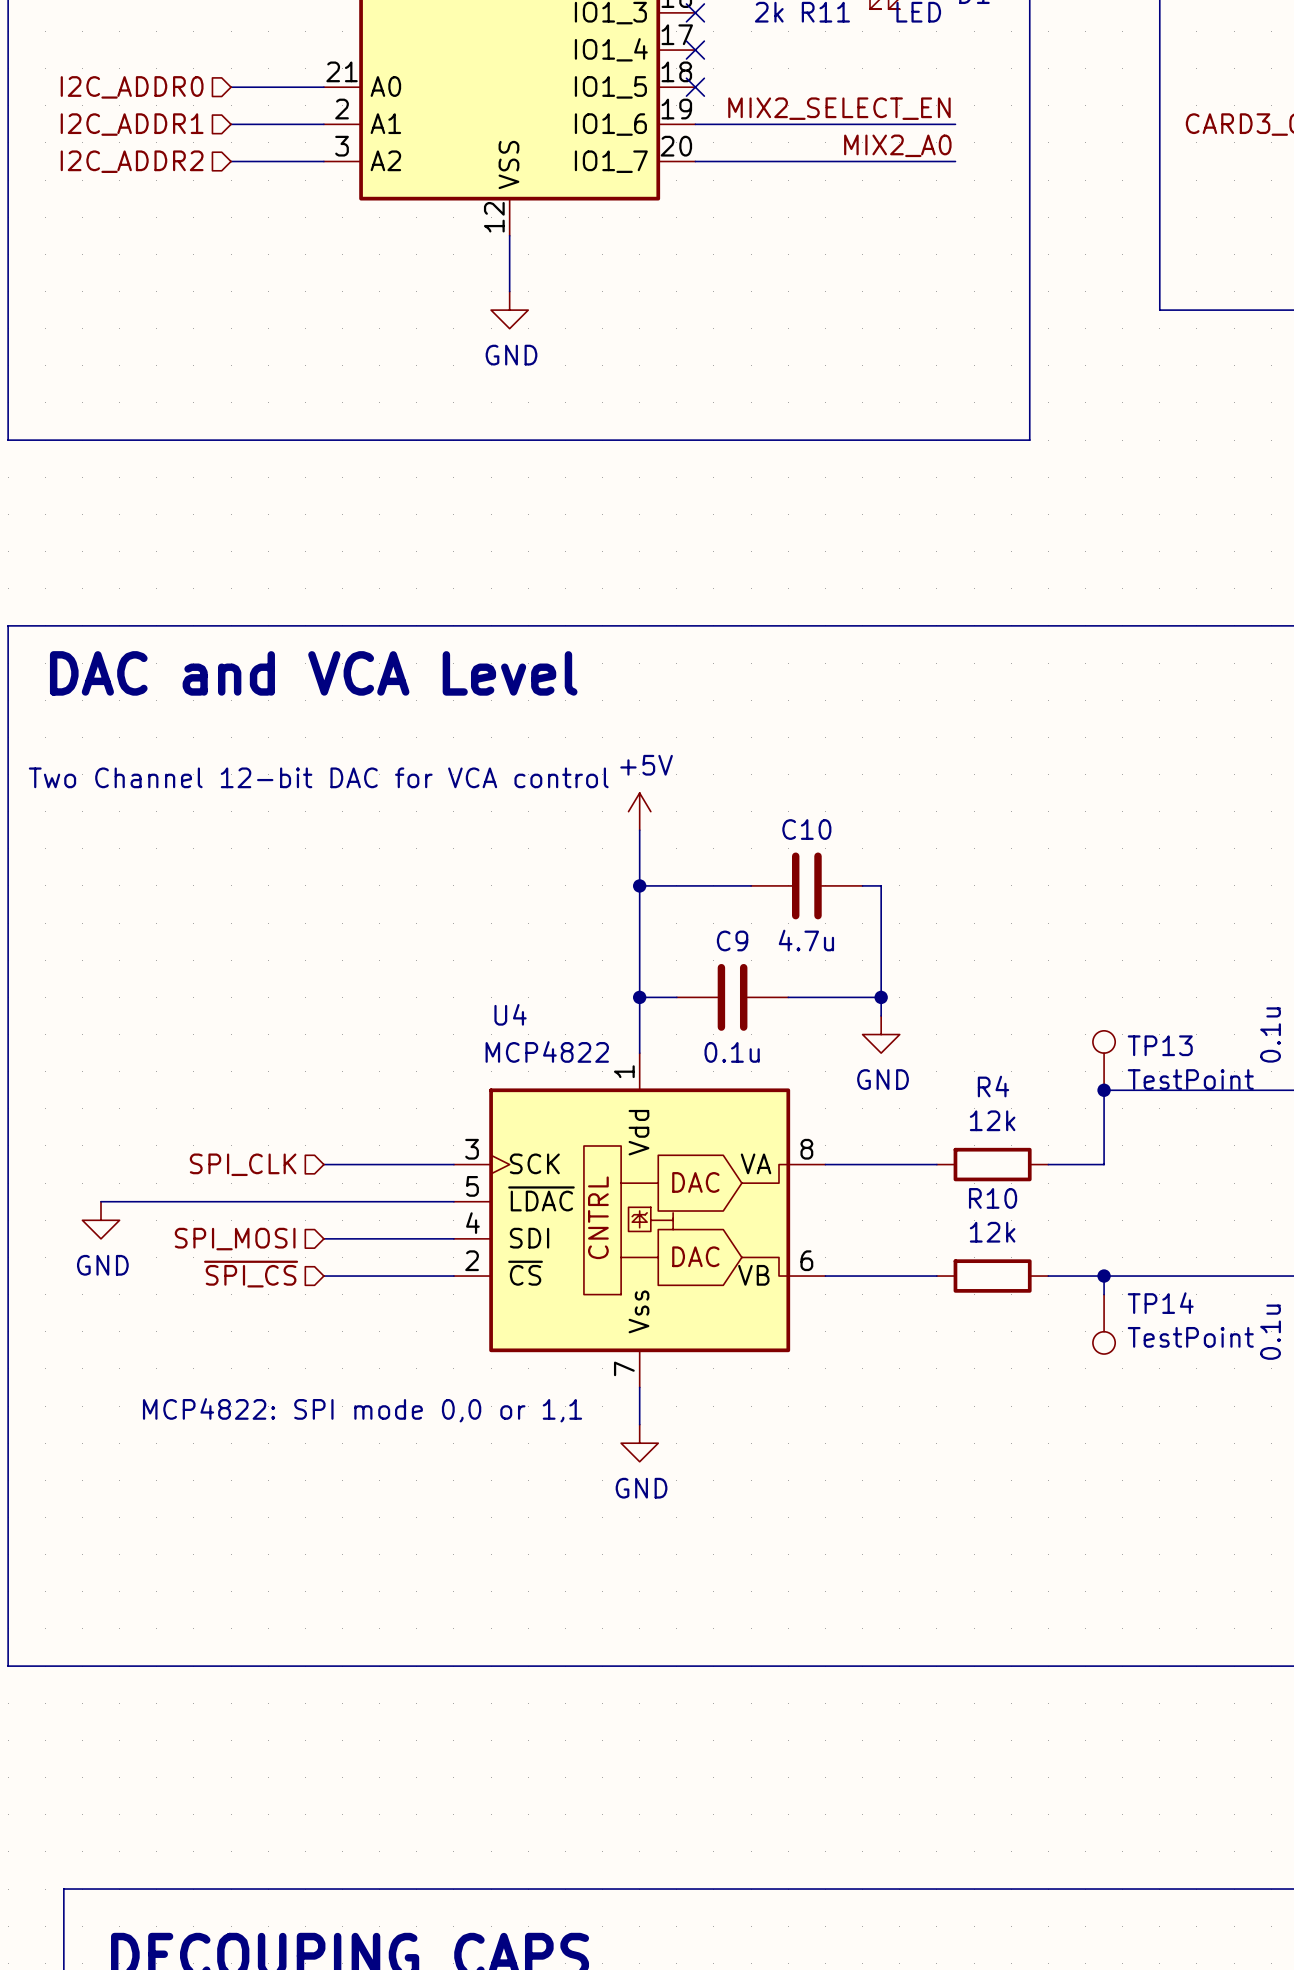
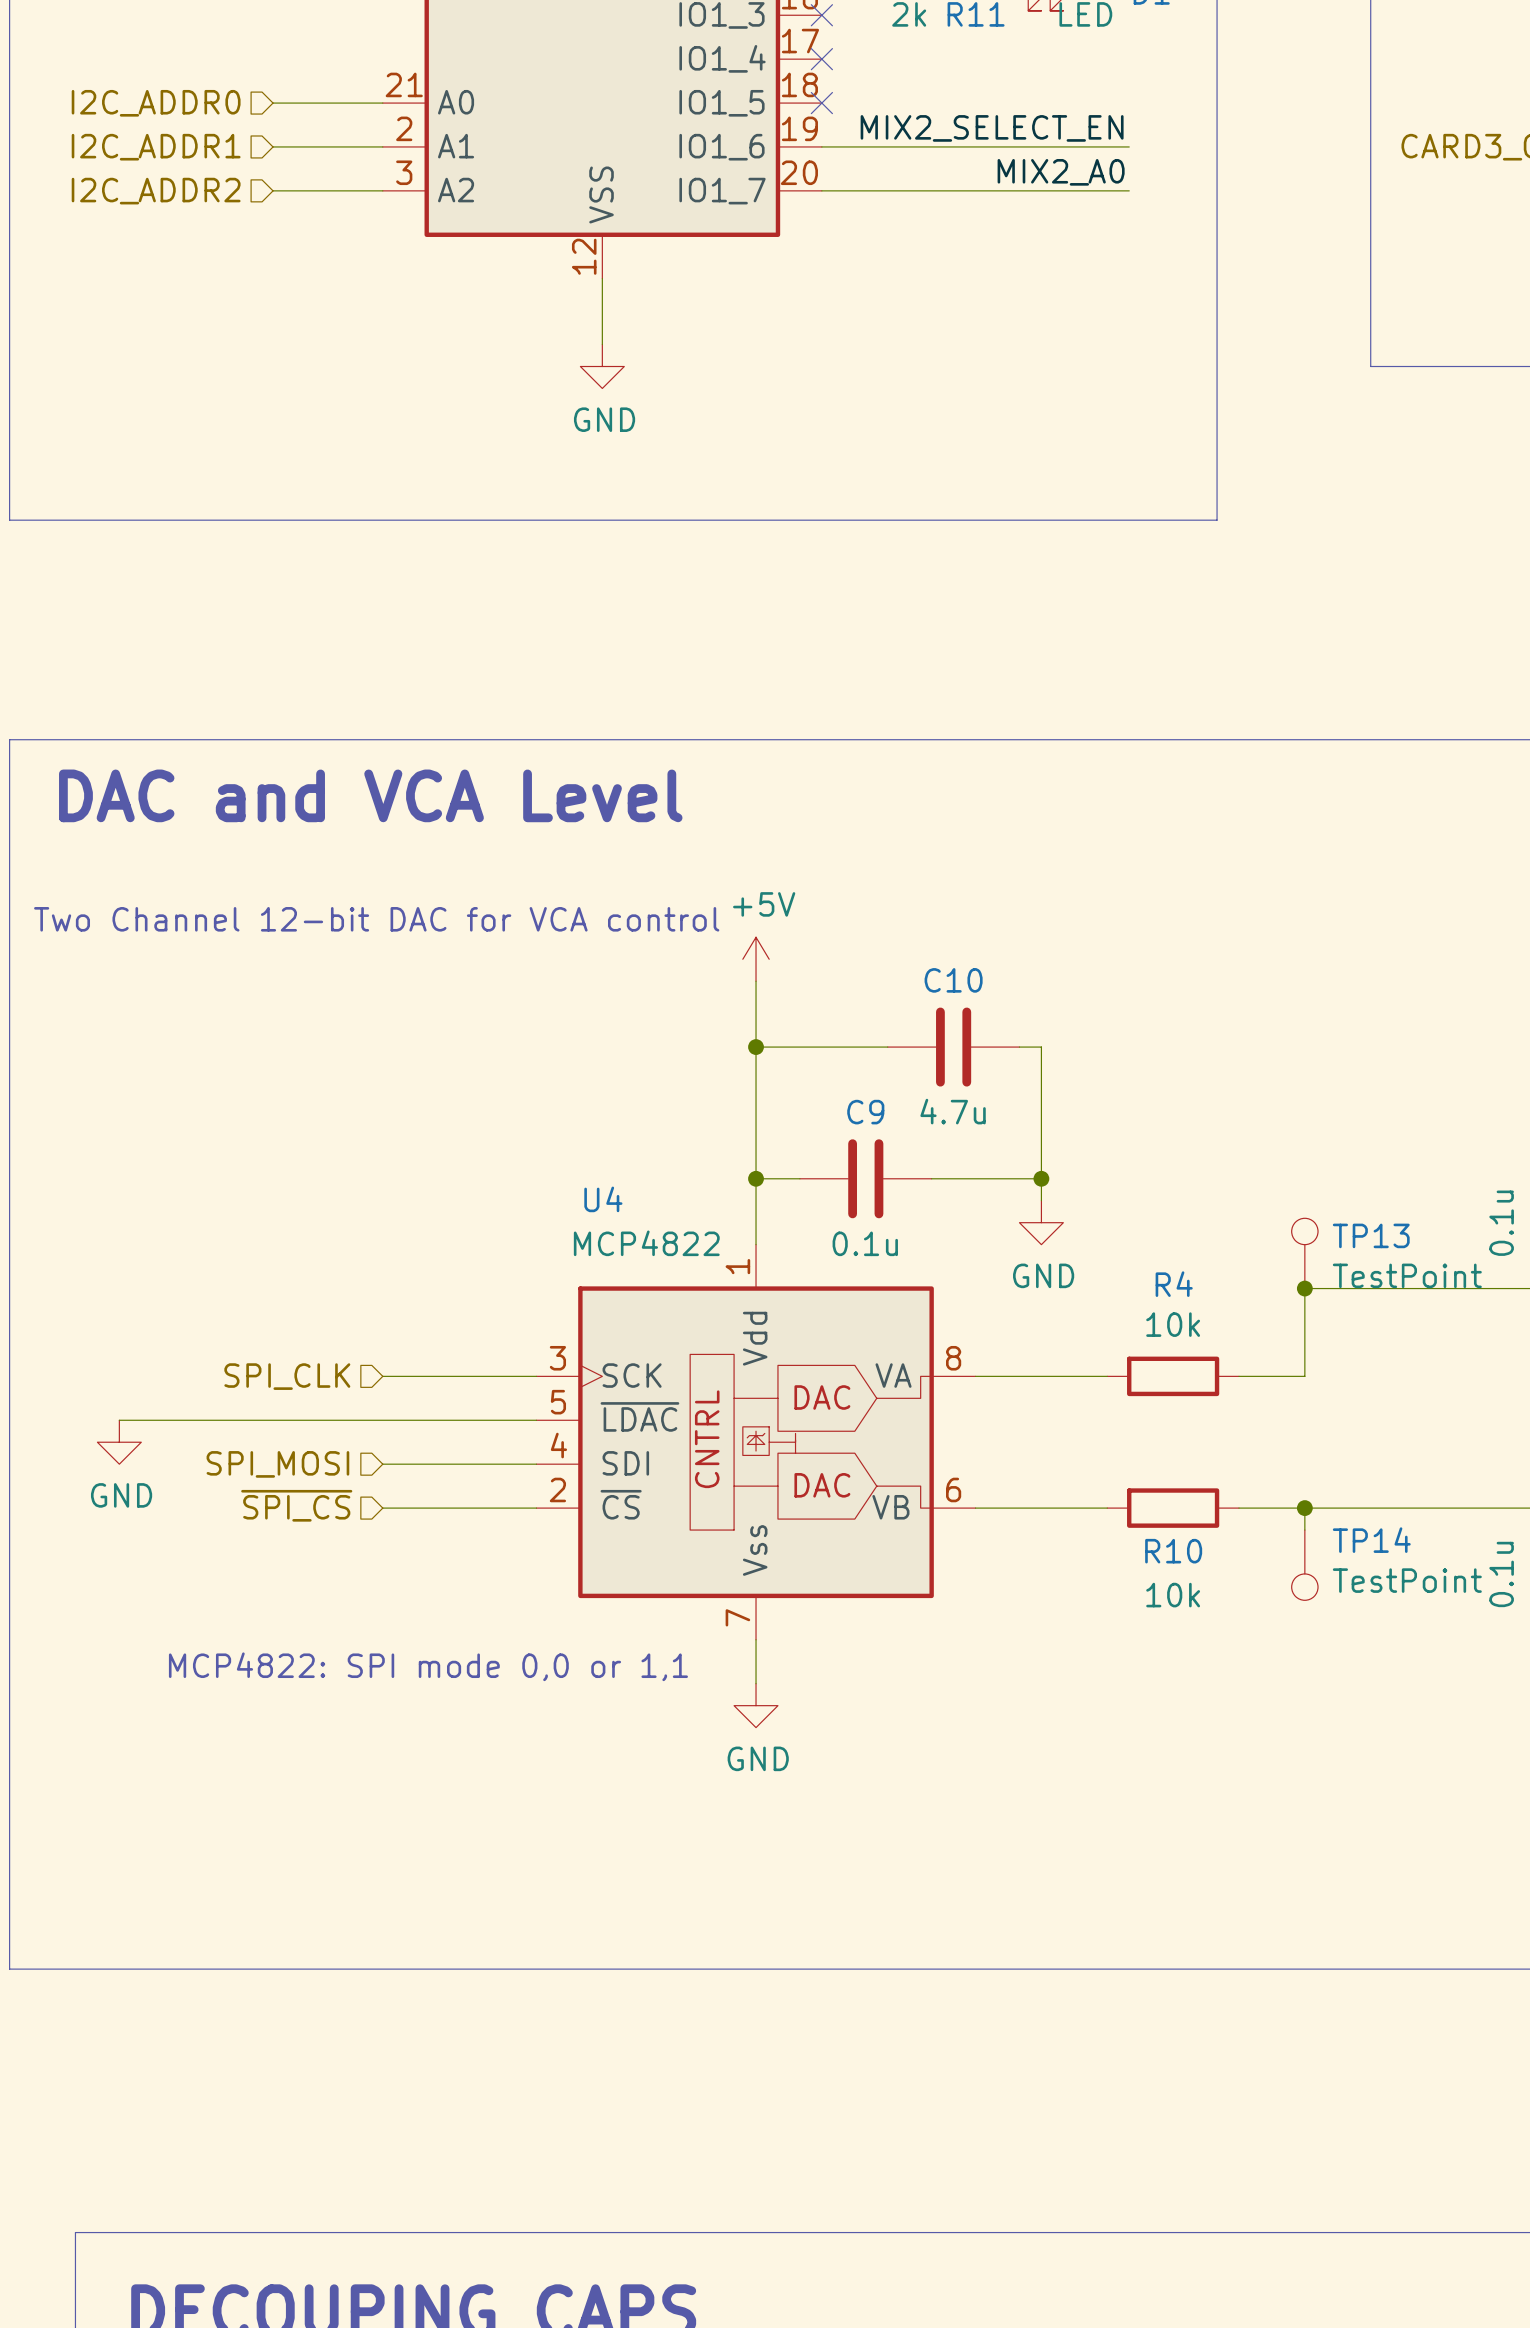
R4 value: 12k (992, 1120) -> 10k (1173, 1324)
R10 name position: R10 (993, 1198) -> R10 (1173, 1551)
R10 value: 12k (992, 1232) -> 10k (1173, 1595)

